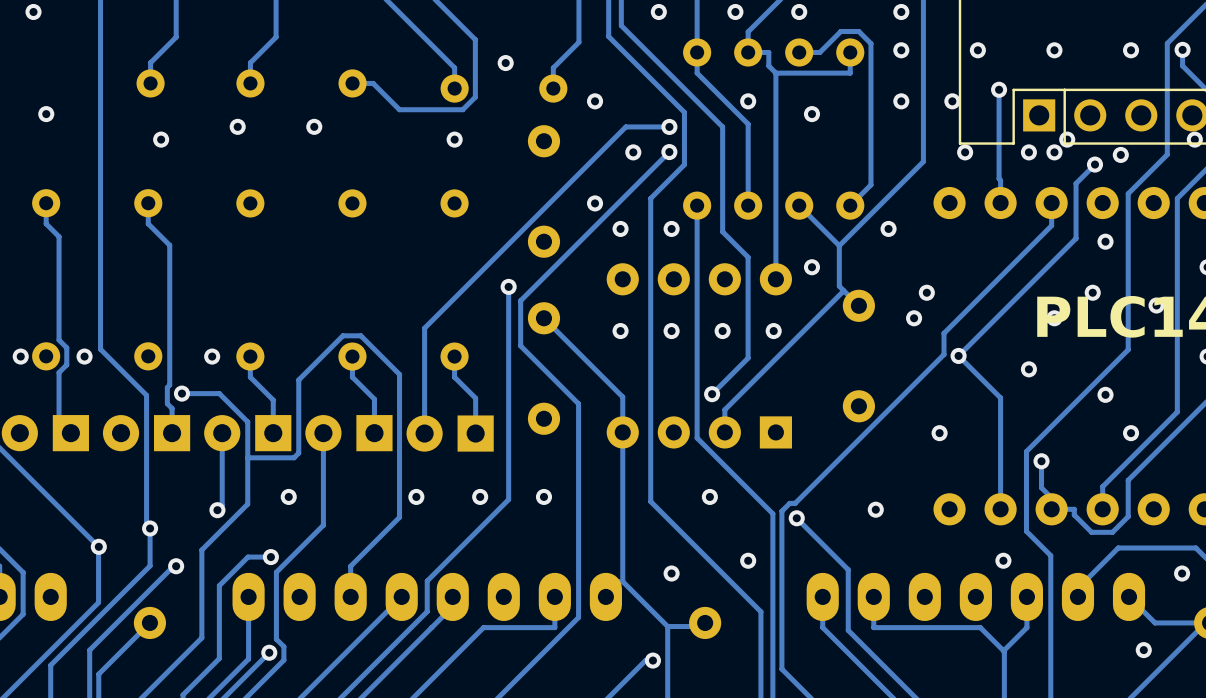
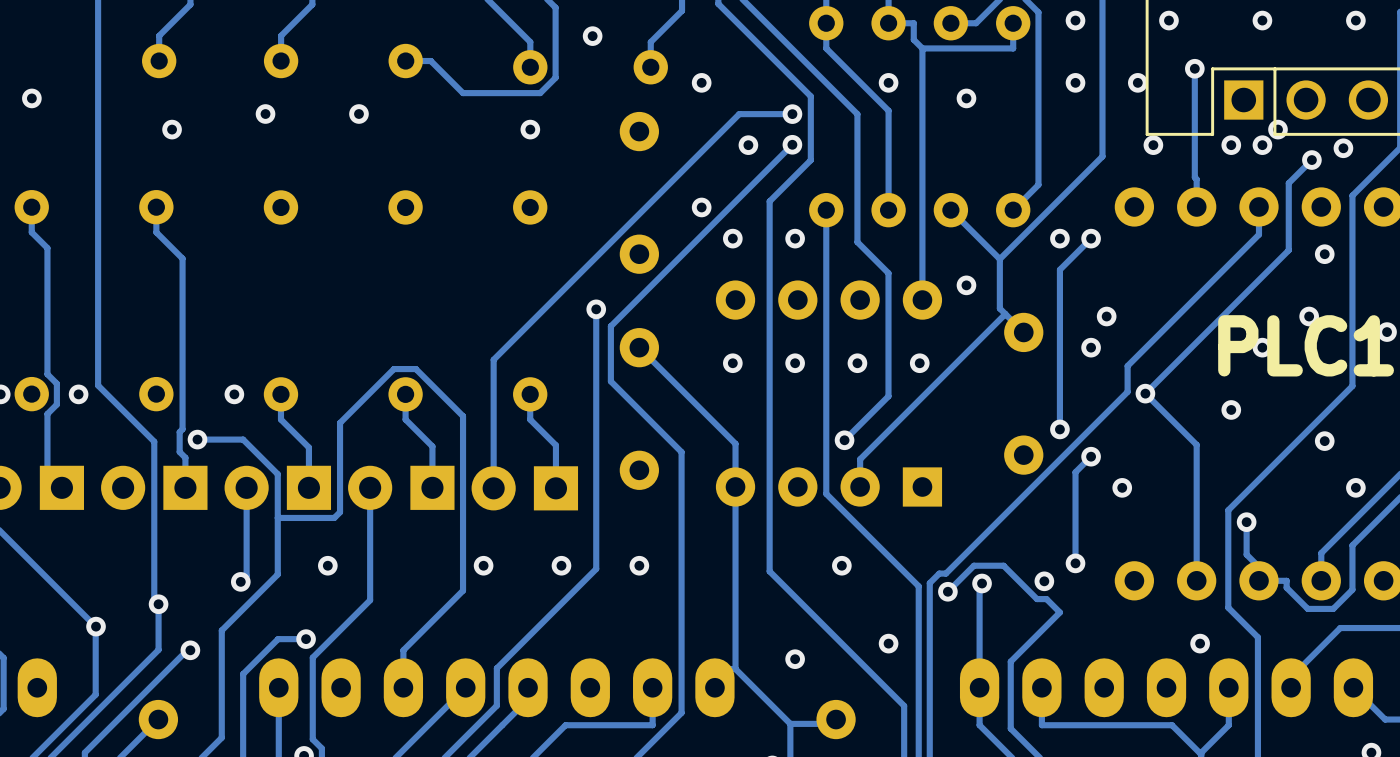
track: none -> (1091, 238) (1059, 269) (1059, 429)
via: none -> (1091, 238)
via: none -> (1059, 429)
track: none -> (1091, 456) (1075, 472) (1075, 563)
via: none -> (1091, 456)
via: none -> (1075, 563)
track: none -> (982, 583) (979, 585) (979, 687)
via: none -> (982, 583)
track: (796, 518) (848, 569) (848, 575) -> (947, 591) (973, 565) (1003, 565) (1036, 599) (1046, 599) (1059, 612) (1010, 661)

